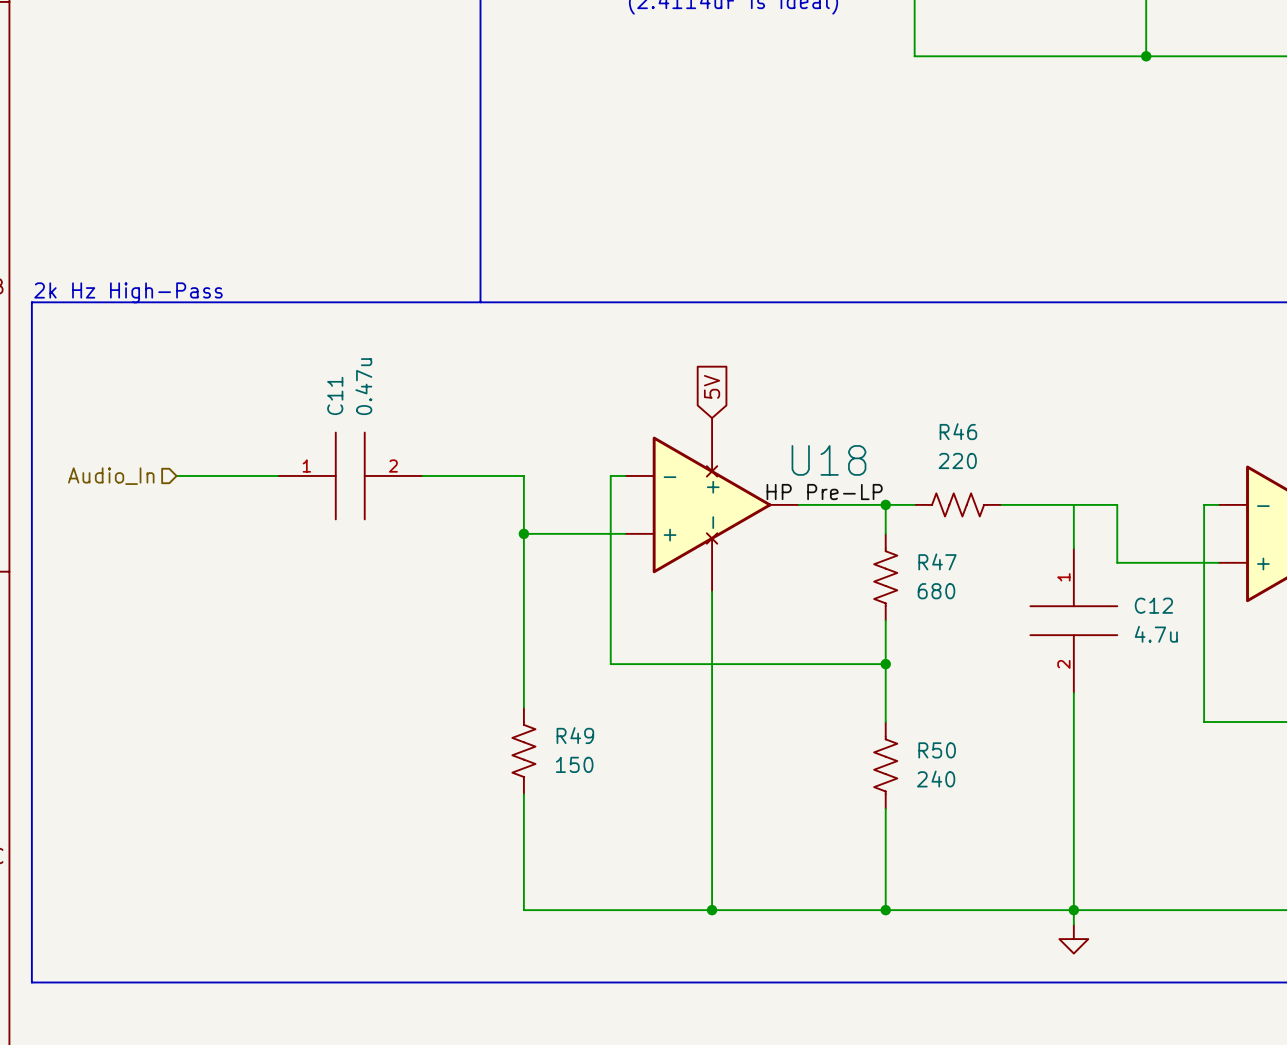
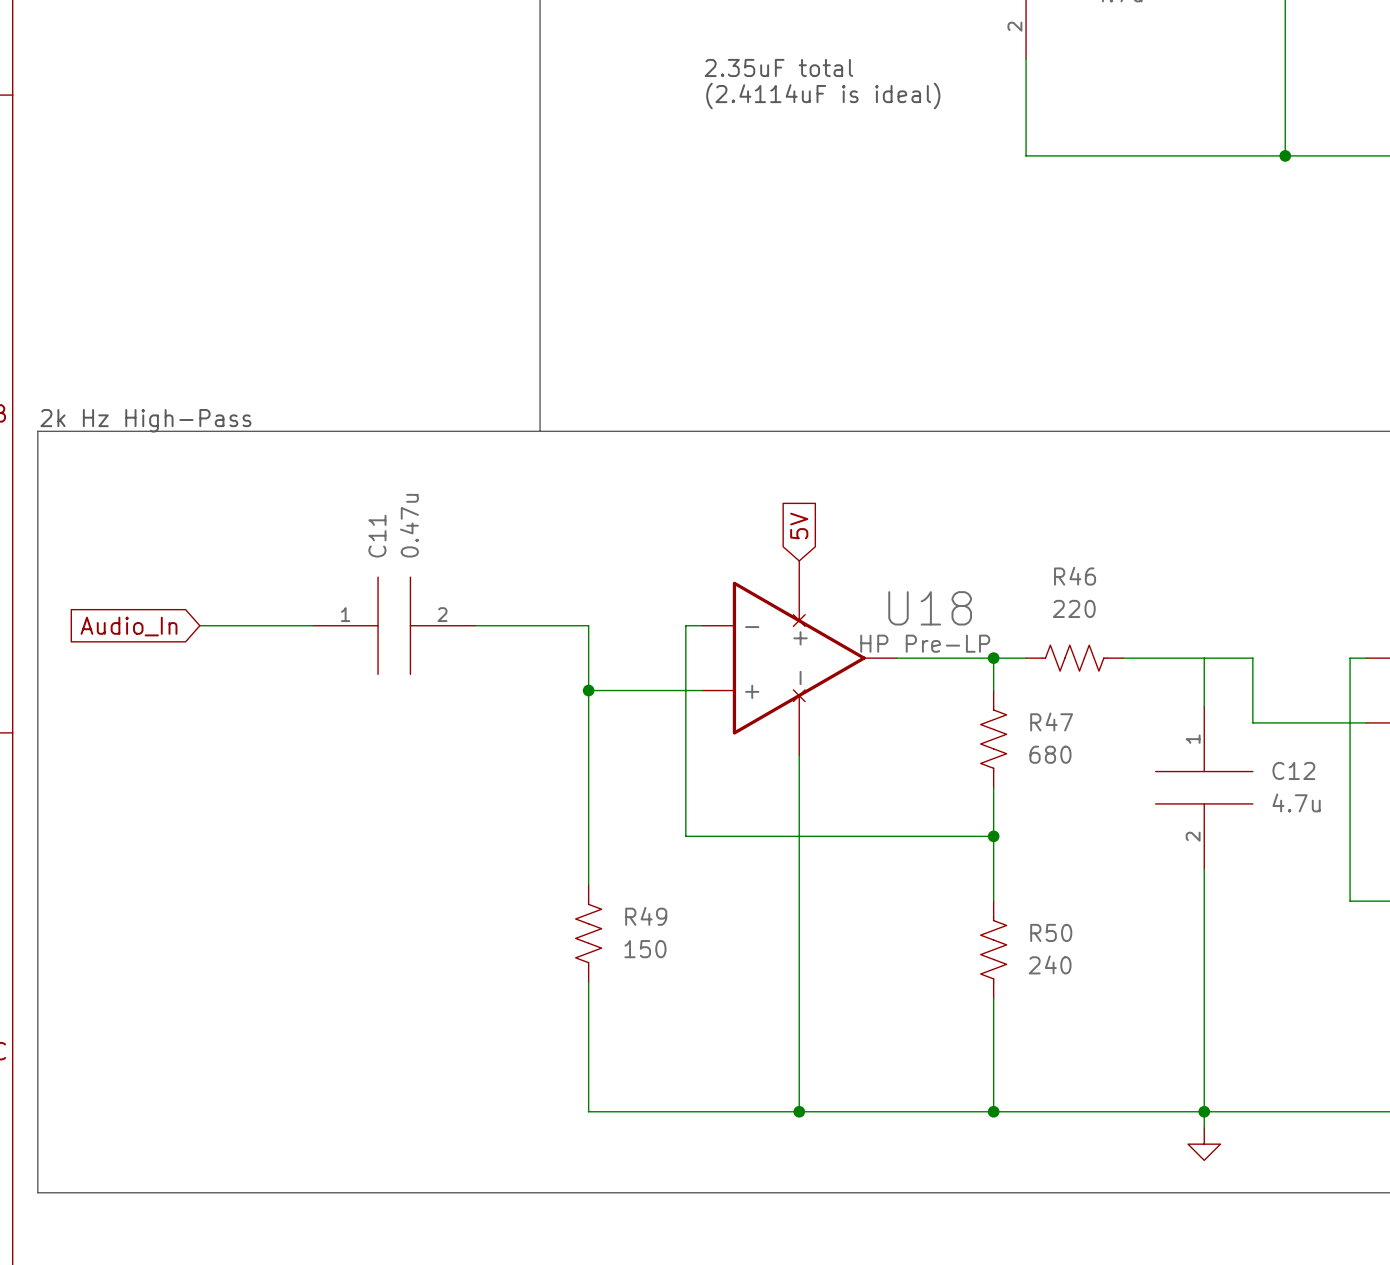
hierarchical label: Audio_In (111, 476) -> none
global label: none -> Audio_In (129, 626)

